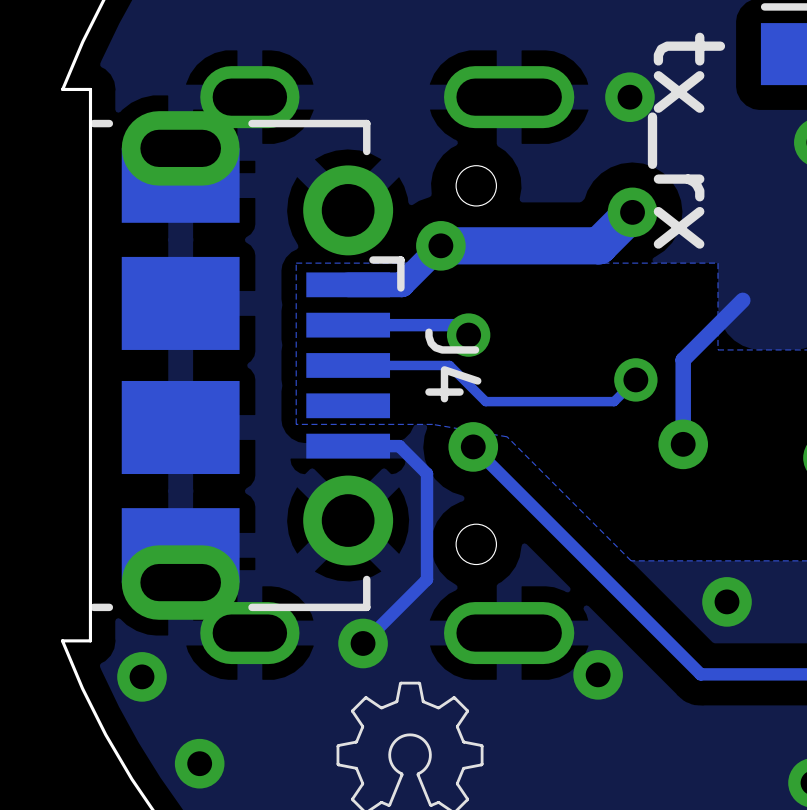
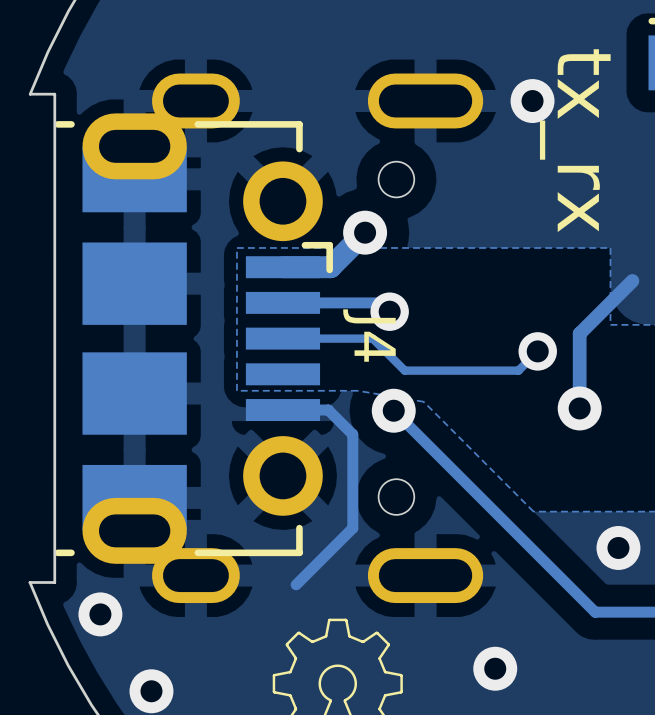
track: (632, 212) (599, 245) (440, 245) -> none
via: (632, 212) -> none
via: (363, 643) -> none
via position: (598, 674) -> (495, 668)

